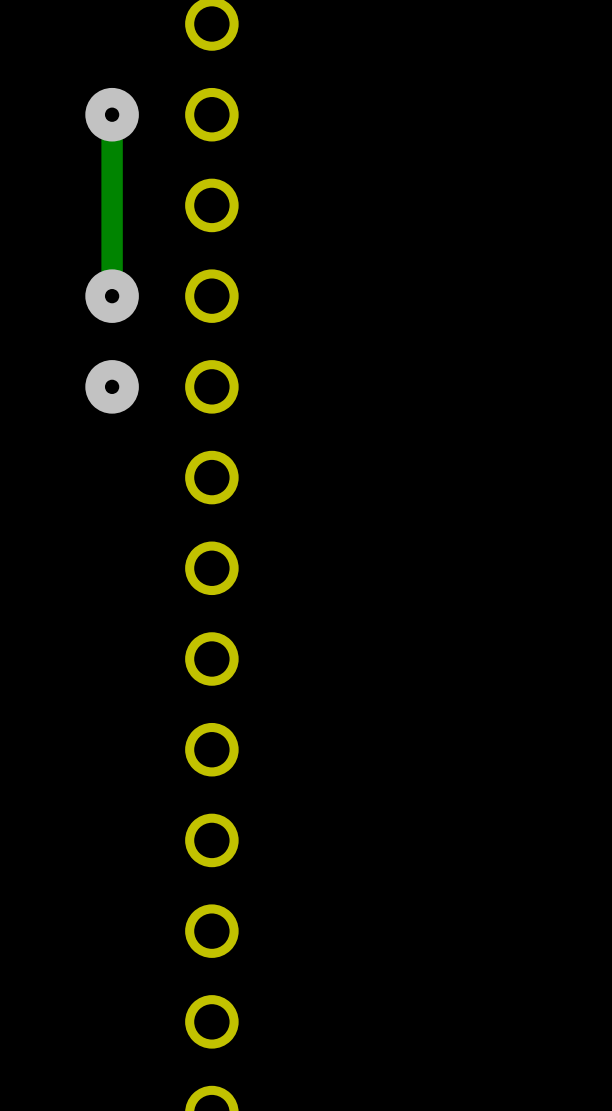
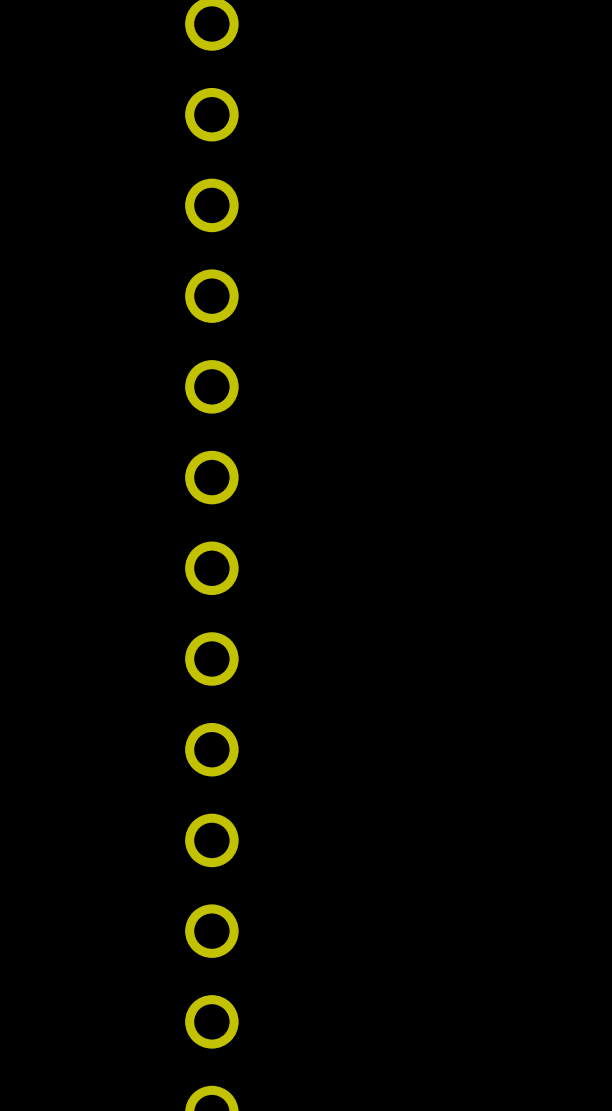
track: (112, 114) (112, 296) -> none
via: (112, 114) -> none
via: (112, 296) -> none
via: (112, 386) -> none

